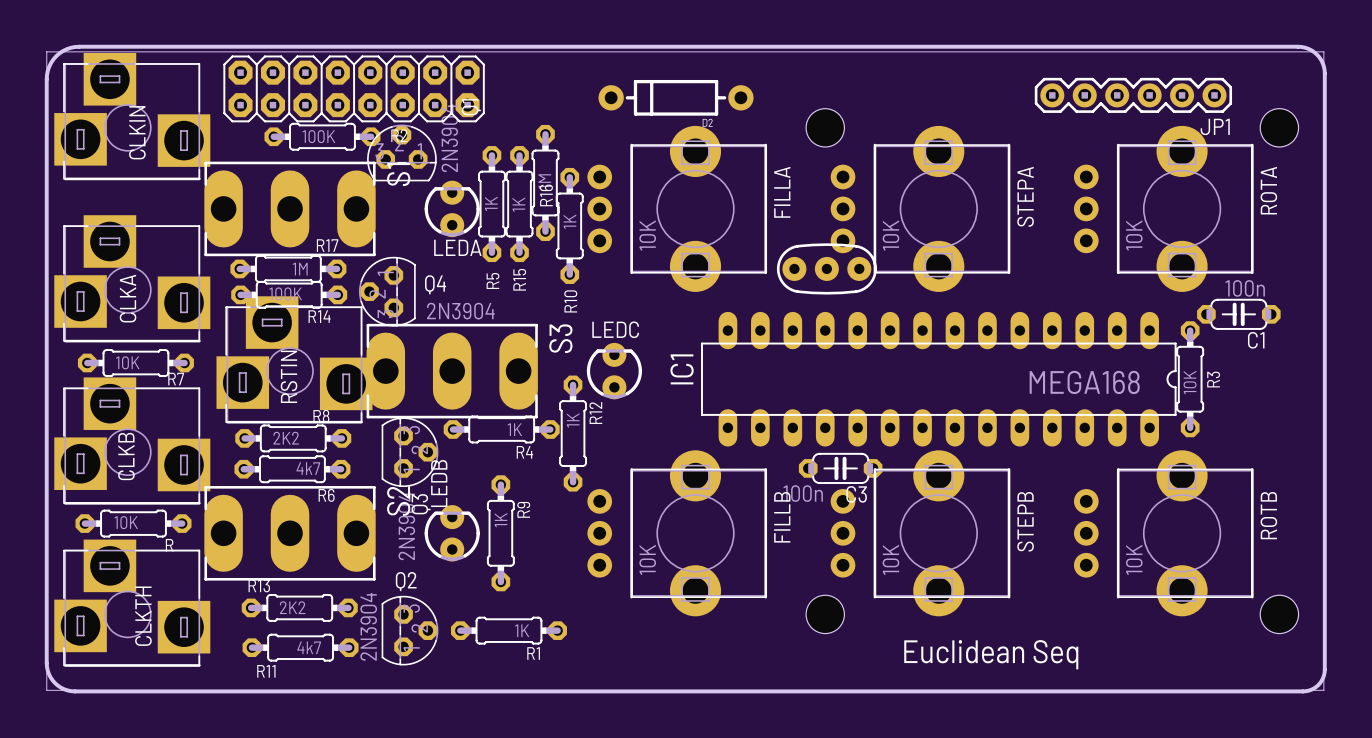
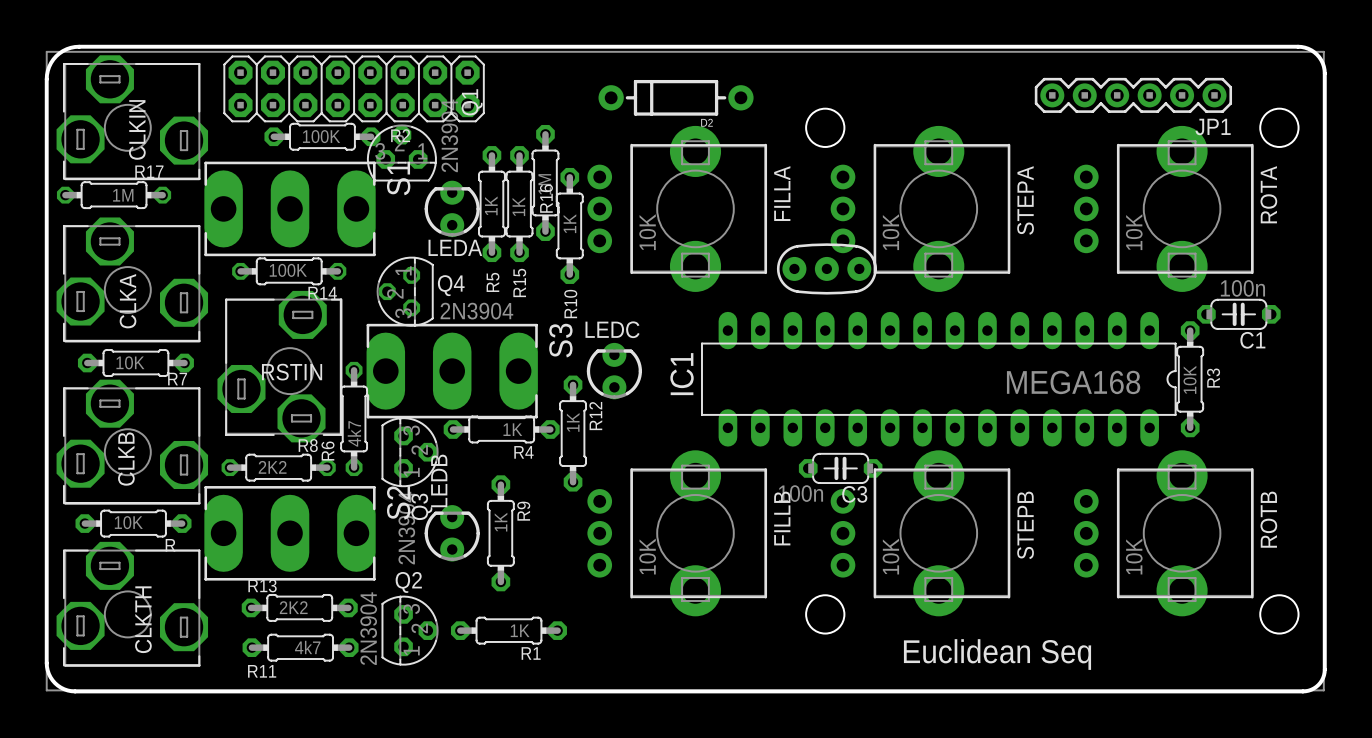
CLKIN footprint: [54, 53, 211, 181] -> [56, 55, 209, 181]
CLKA footprint: [54, 215, 211, 343] -> [56, 217, 209, 343]
R17 footprint: [230, 254, 347, 283] -> [56, 181, 172, 210]
Q4 footprint: [358, 256, 416, 327] -> [376, 256, 434, 327]
R14 footprint: [231, 280, 348, 309] -> [232, 257, 347, 286]
RSTIN: (294, 359) -> none
RSTIN: none -> (279, 366)
CLKB footprint: [54, 377, 211, 505] -> [56, 379, 209, 505]
R8 footprint: [235, 424, 352, 453] -> [221, 453, 336, 482]
R6 footprint: [234, 455, 351, 484] -> [340, 361, 369, 477]
R6 name position: R6 (326, 495) -> R6 (327, 451)
CLKTH footprint: [54, 539, 211, 667] -> [56, 541, 209, 667]

